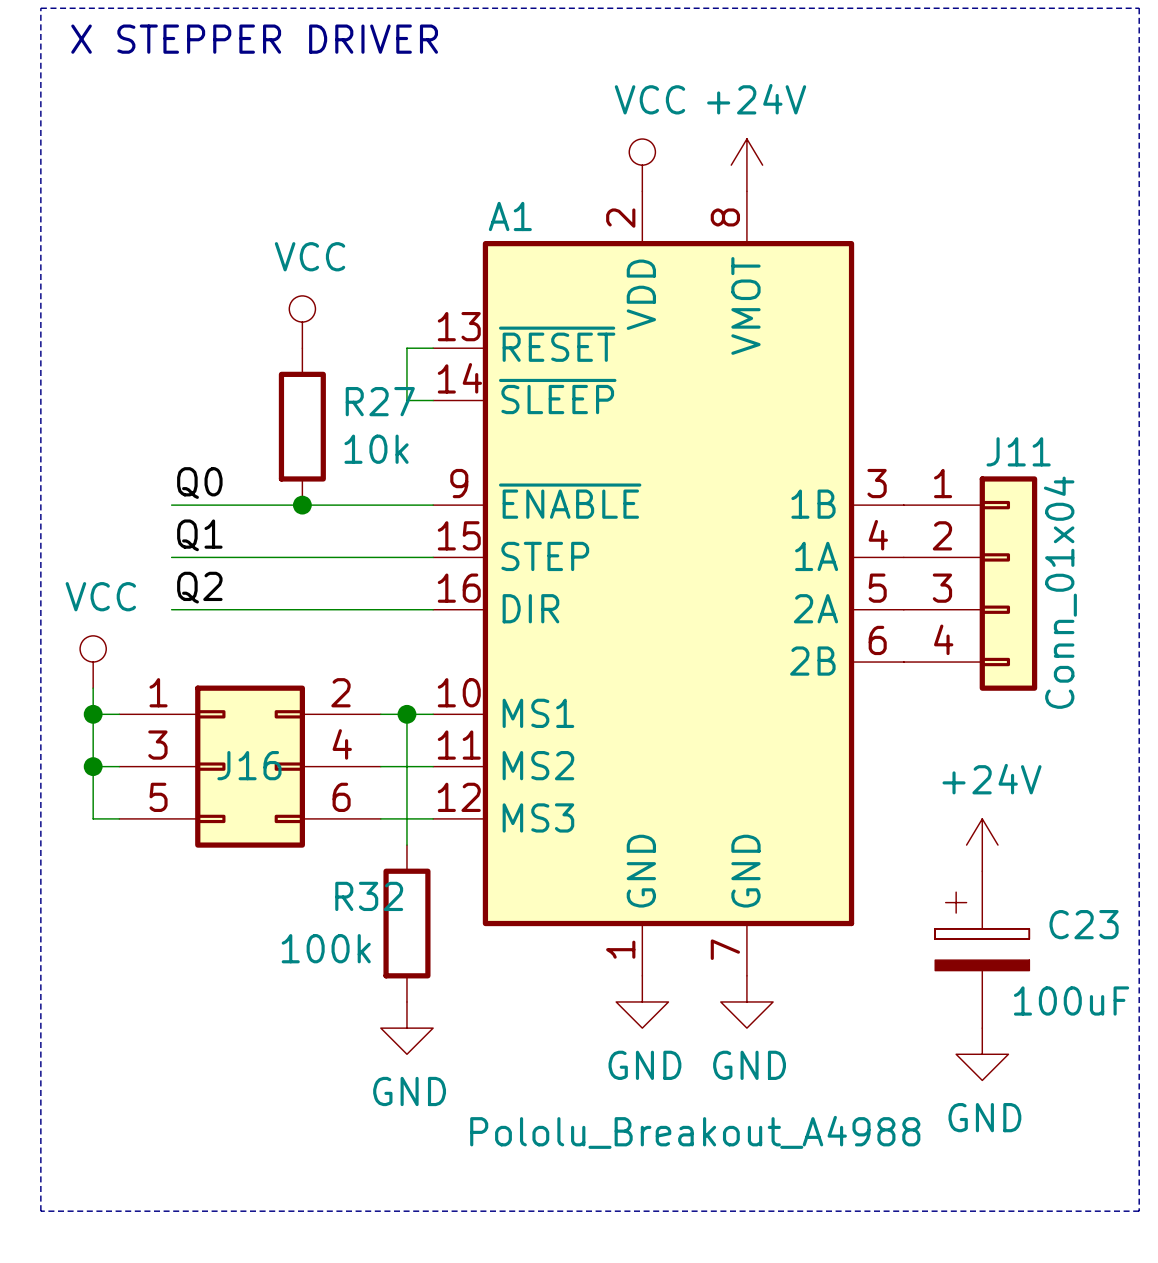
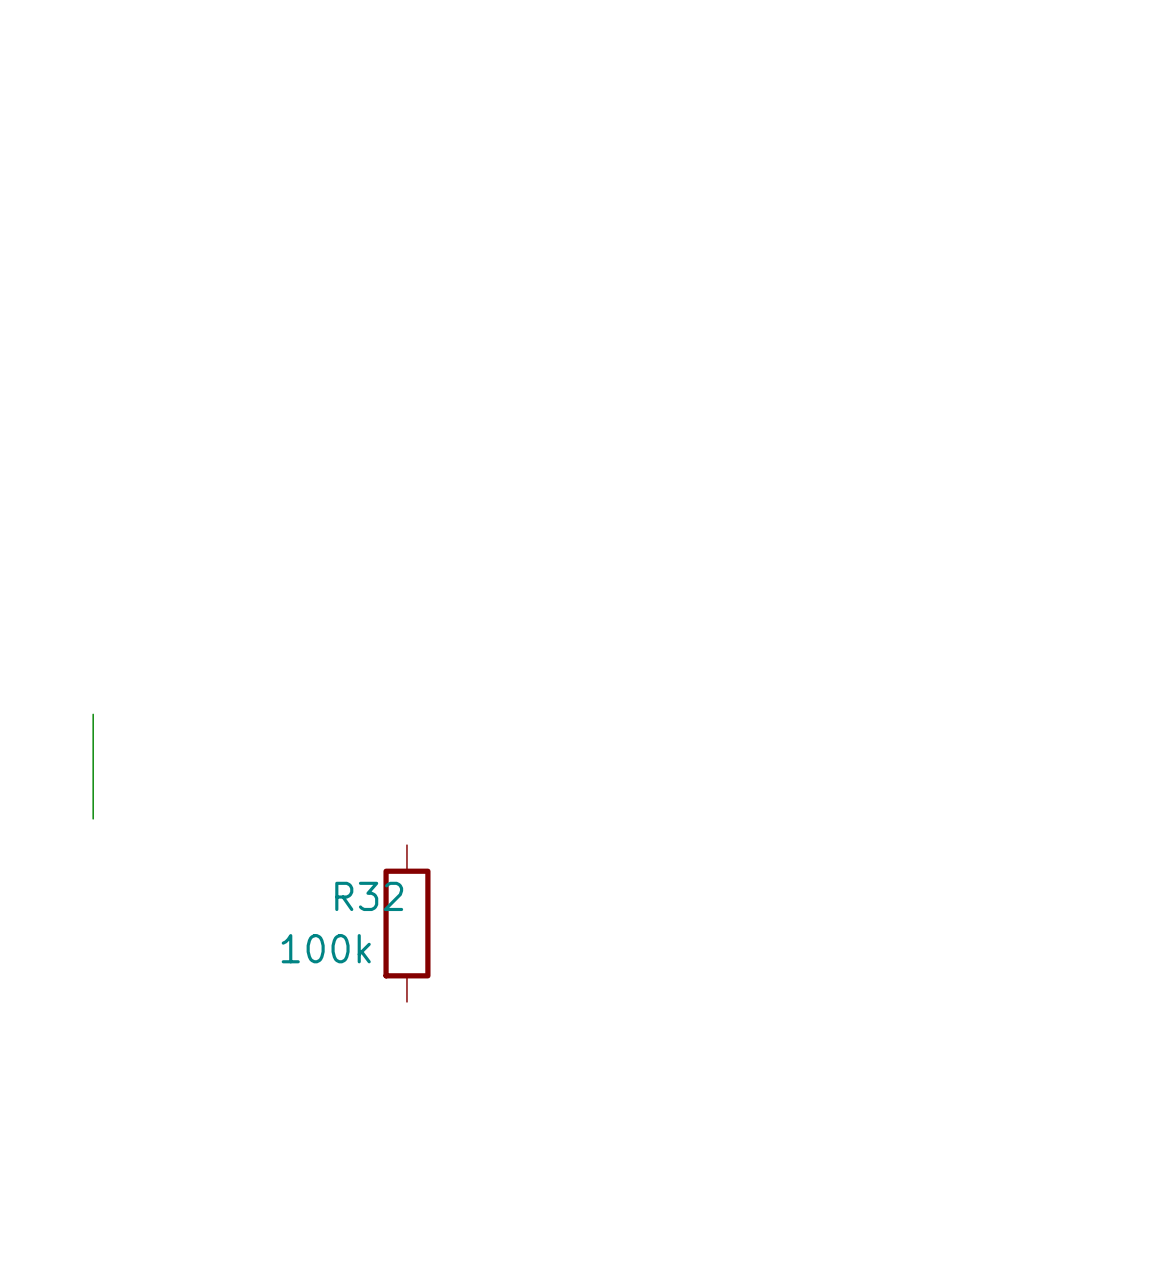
line: (40, 8) (40, 1211) (1139, 1211) (1139, 8) (40, 8) -> none
text: X STEPPER DRIVER (254, 39) -> none
power symbol: VCC (642, 165) -> none
power symbol: +24V (746, 165) -> none
power symbol: VCC (302, 322) -> none
wire: (433, 348) (406, 348) (406, 400) (433, 400) -> none
R27: 10k (302, 426) -> none
label: Q0 (199, 483) -> none
wire: (171, 505) (433, 505) -> none
junction: (302, 505) -> none
label: Q1 (199, 535) -> none
wire: (171, 557) (433, 557) -> none
A1: Pololu_Breakout_A4988 (668, 583) -> none
J11: Conn_01x04 (970, 583) -> none
label: Q2 (199, 587) -> none
wire: (171, 609) (433, 609) -> none
power symbol: VCC (93, 662) -> none
wire: (93, 688) (93, 714) (119, 714) -> none
junction: (93, 714) -> none
wire: (380, 714) (433, 714) -> none
wire: (406, 714) (406, 845) -> none
junction: (406, 714) -> none
wire: (93, 766) (119, 766) -> none
junction: (93, 766) -> none
J16: (250, 766) -> none
wire: (380, 766) (433, 766) -> none
wire: (93, 818) (119, 818) -> none
wire: (380, 818) (433, 818) -> none
power symbol: +24V (982, 845) -> none
C23: 100uF (982, 949) -> none
power symbol: GND (642, 1001) -> none
power symbol: GND (746, 1001) -> none
power symbol: GND (406, 1028) -> none
power symbol: GND (982, 1054) -> none

